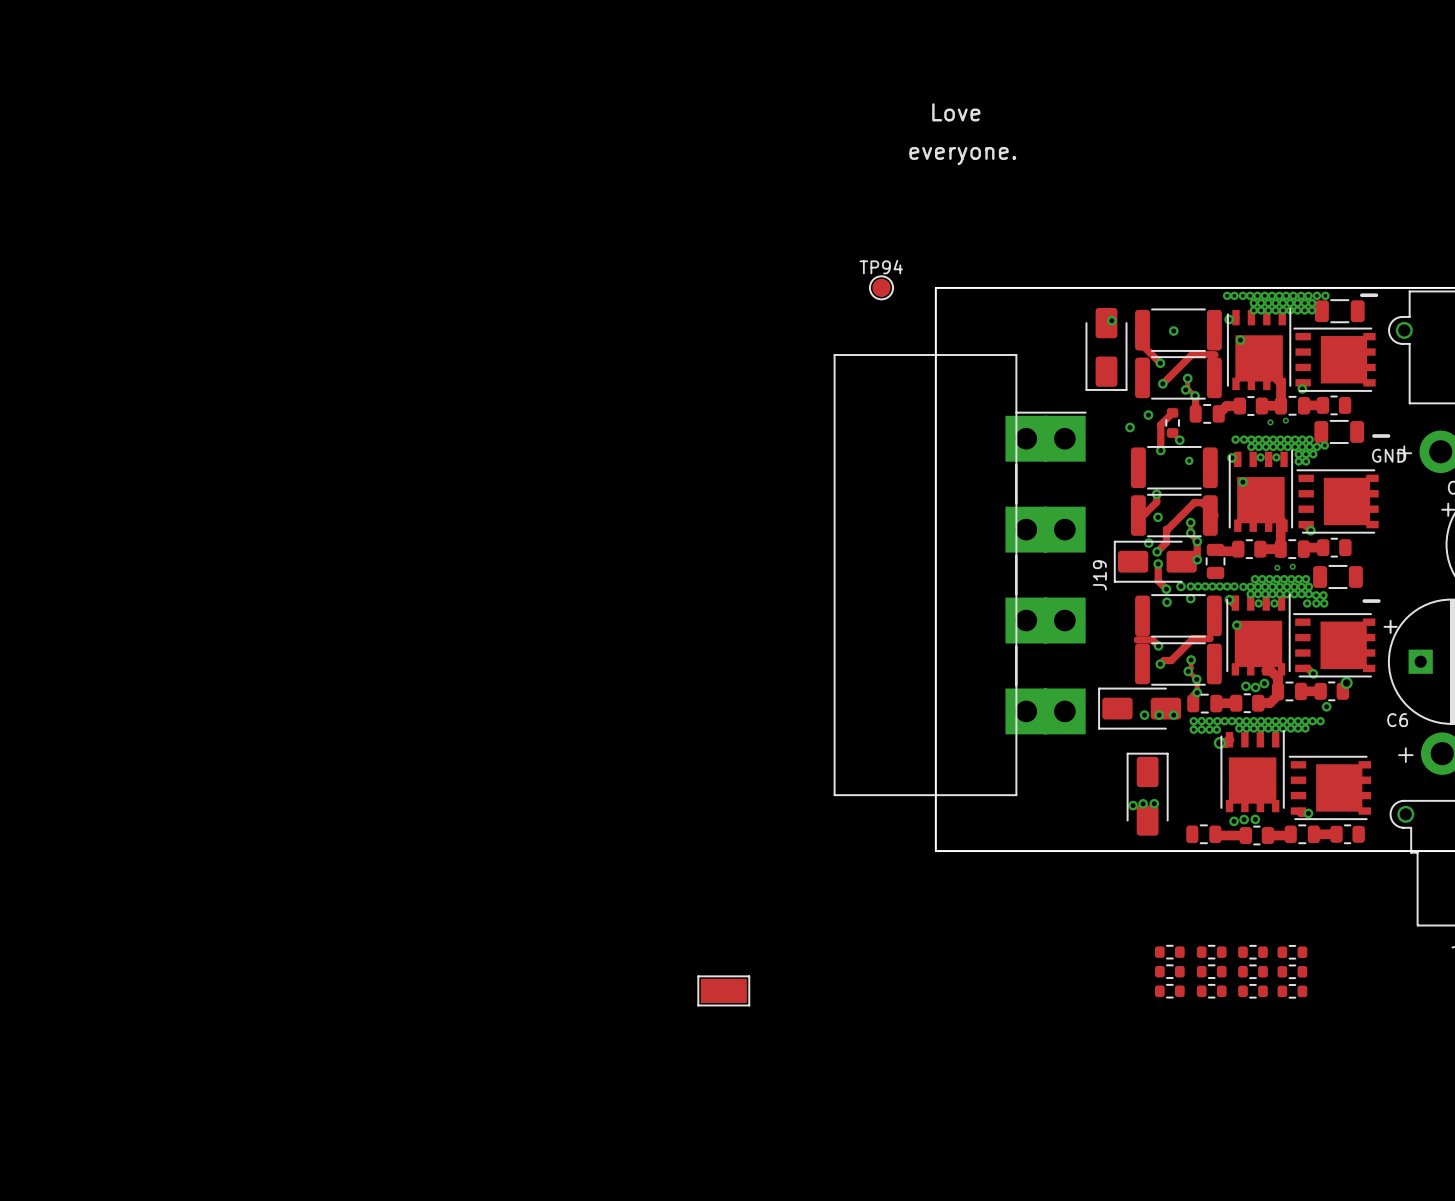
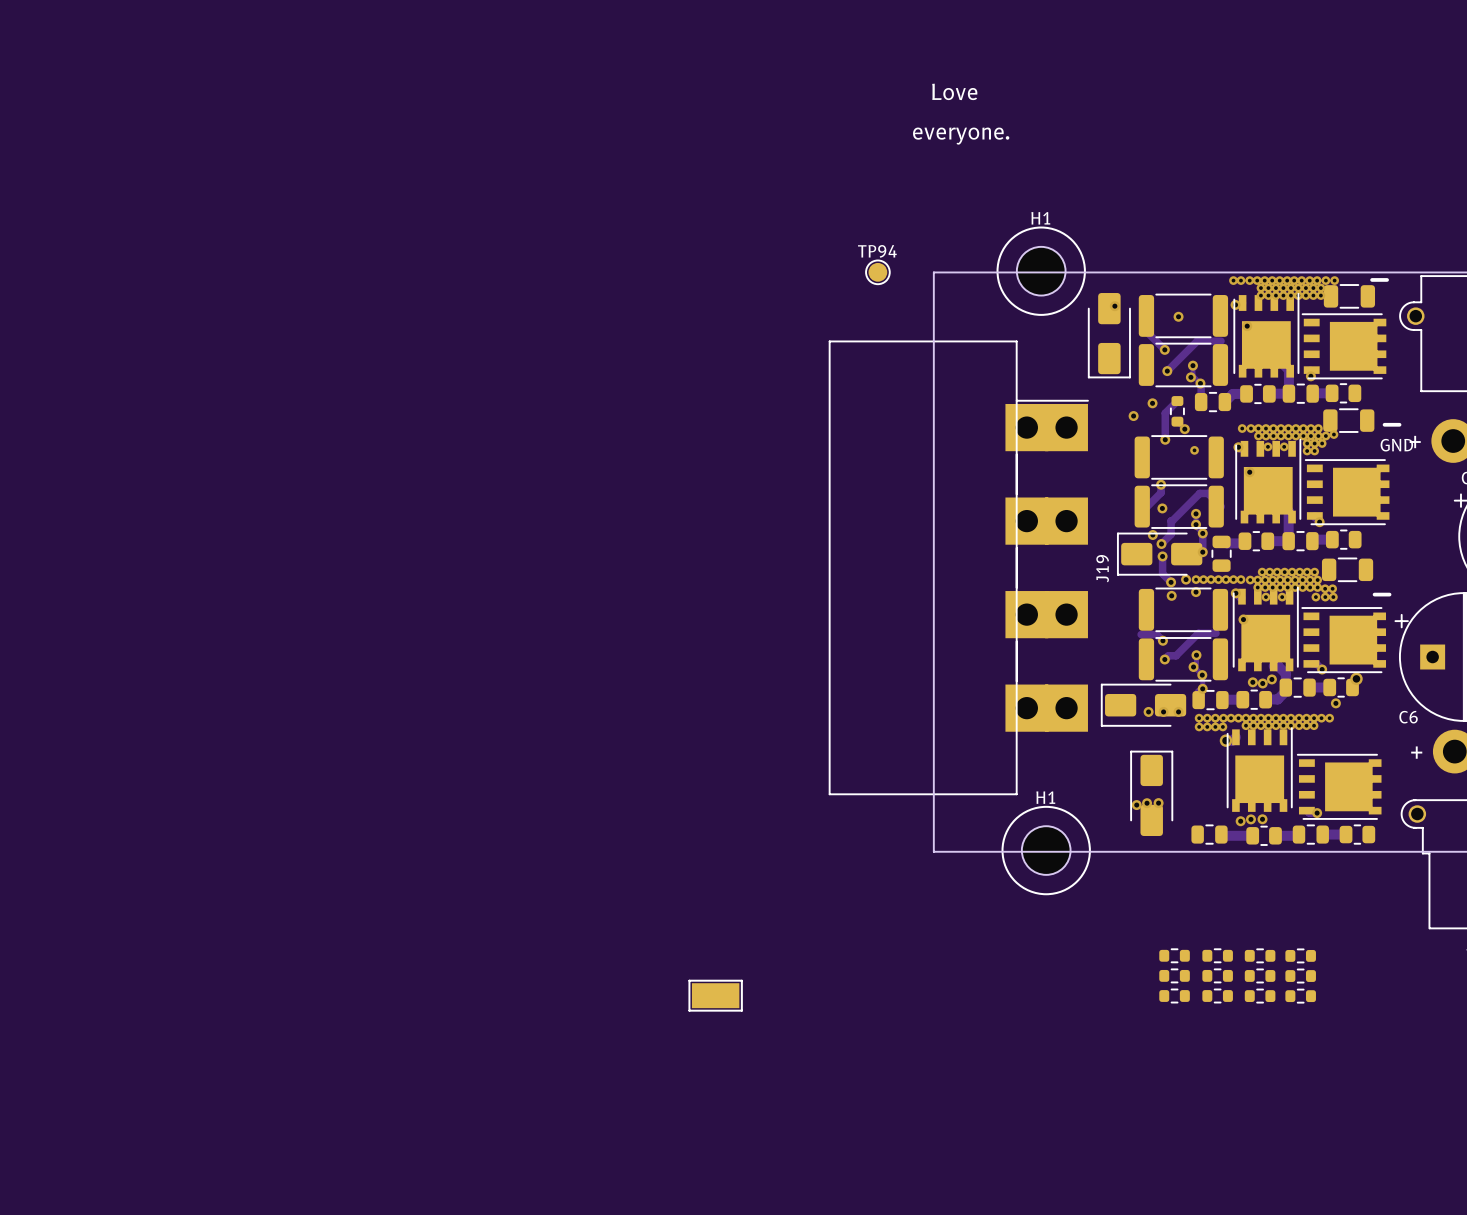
H1: none -> (1041, 271)
via: (1285, 420) -> none
via: (1270, 422) -> none
via: (1292, 566) -> none
via: (1277, 567) -> none
H1: none -> (1046, 850)

